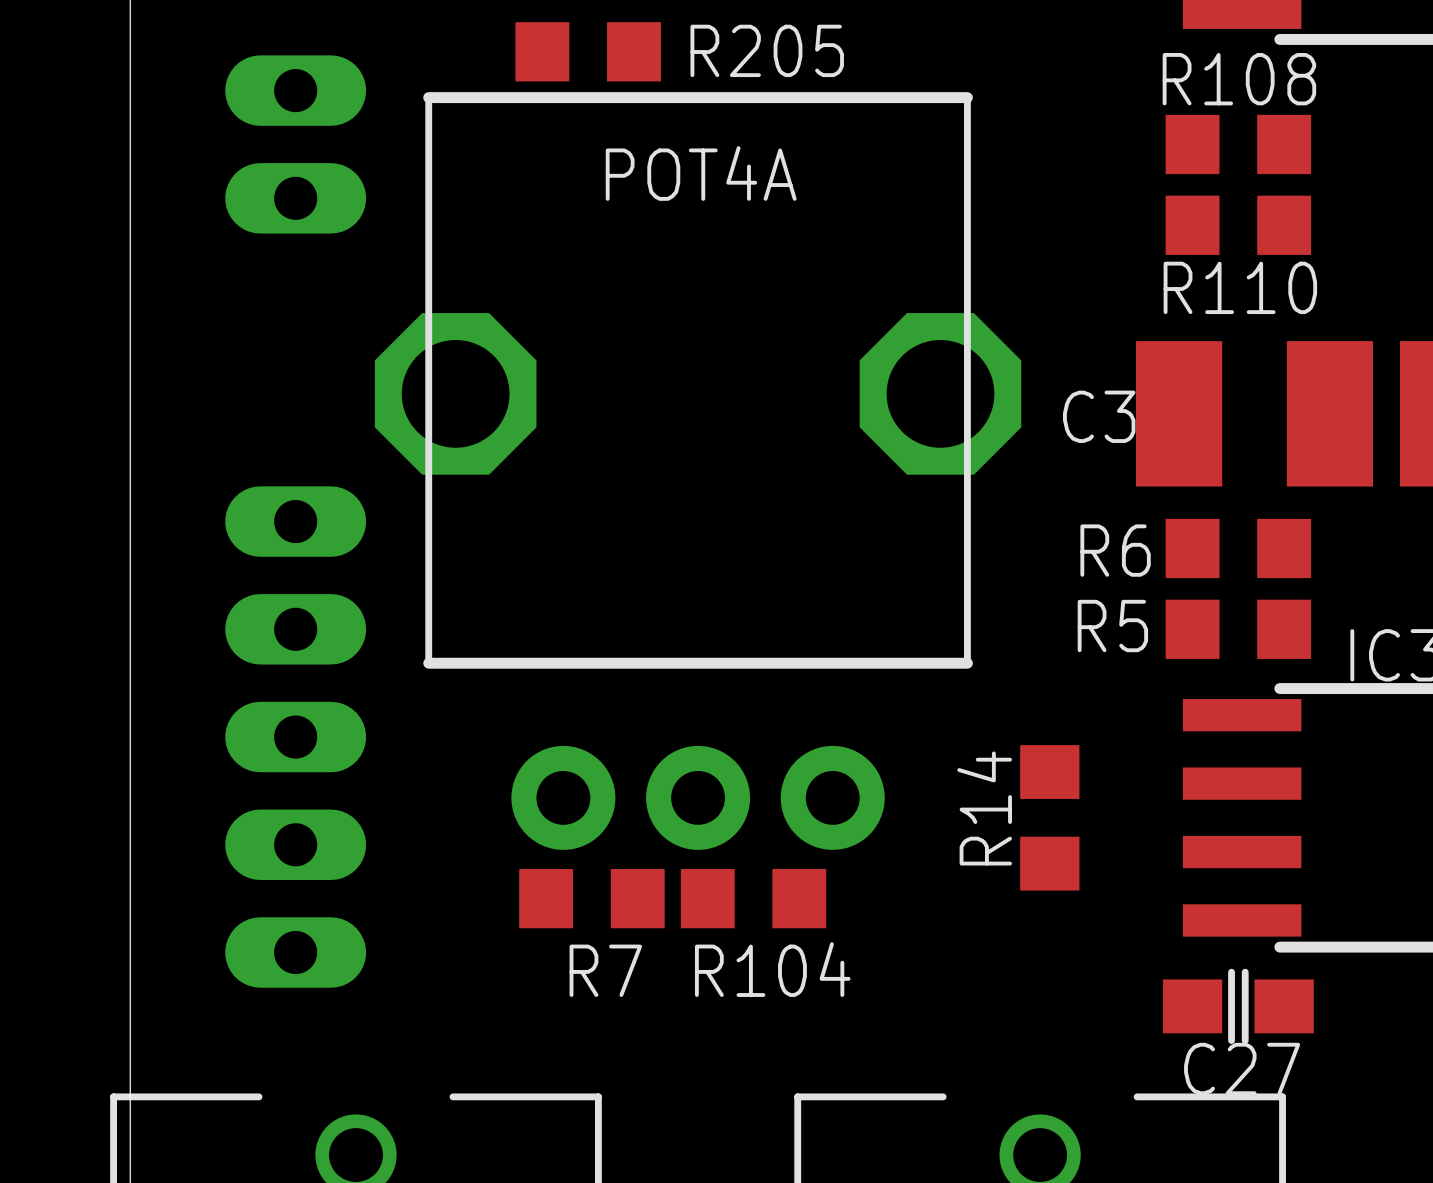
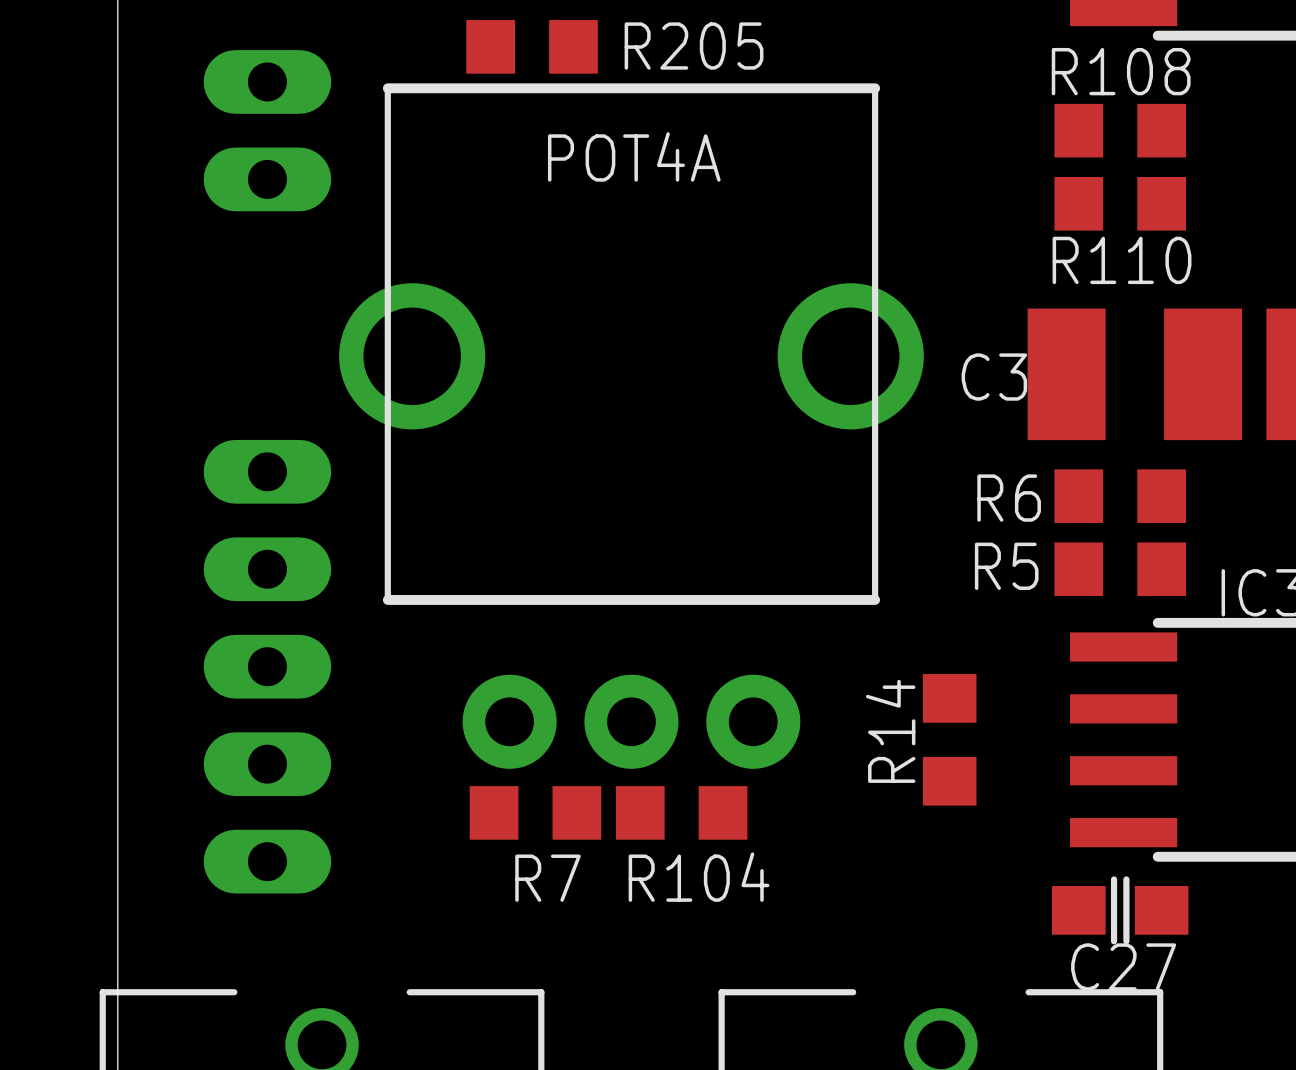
POT4A footprint: [374, 92, 1022, 850] -> [339, 83, 924, 769]

